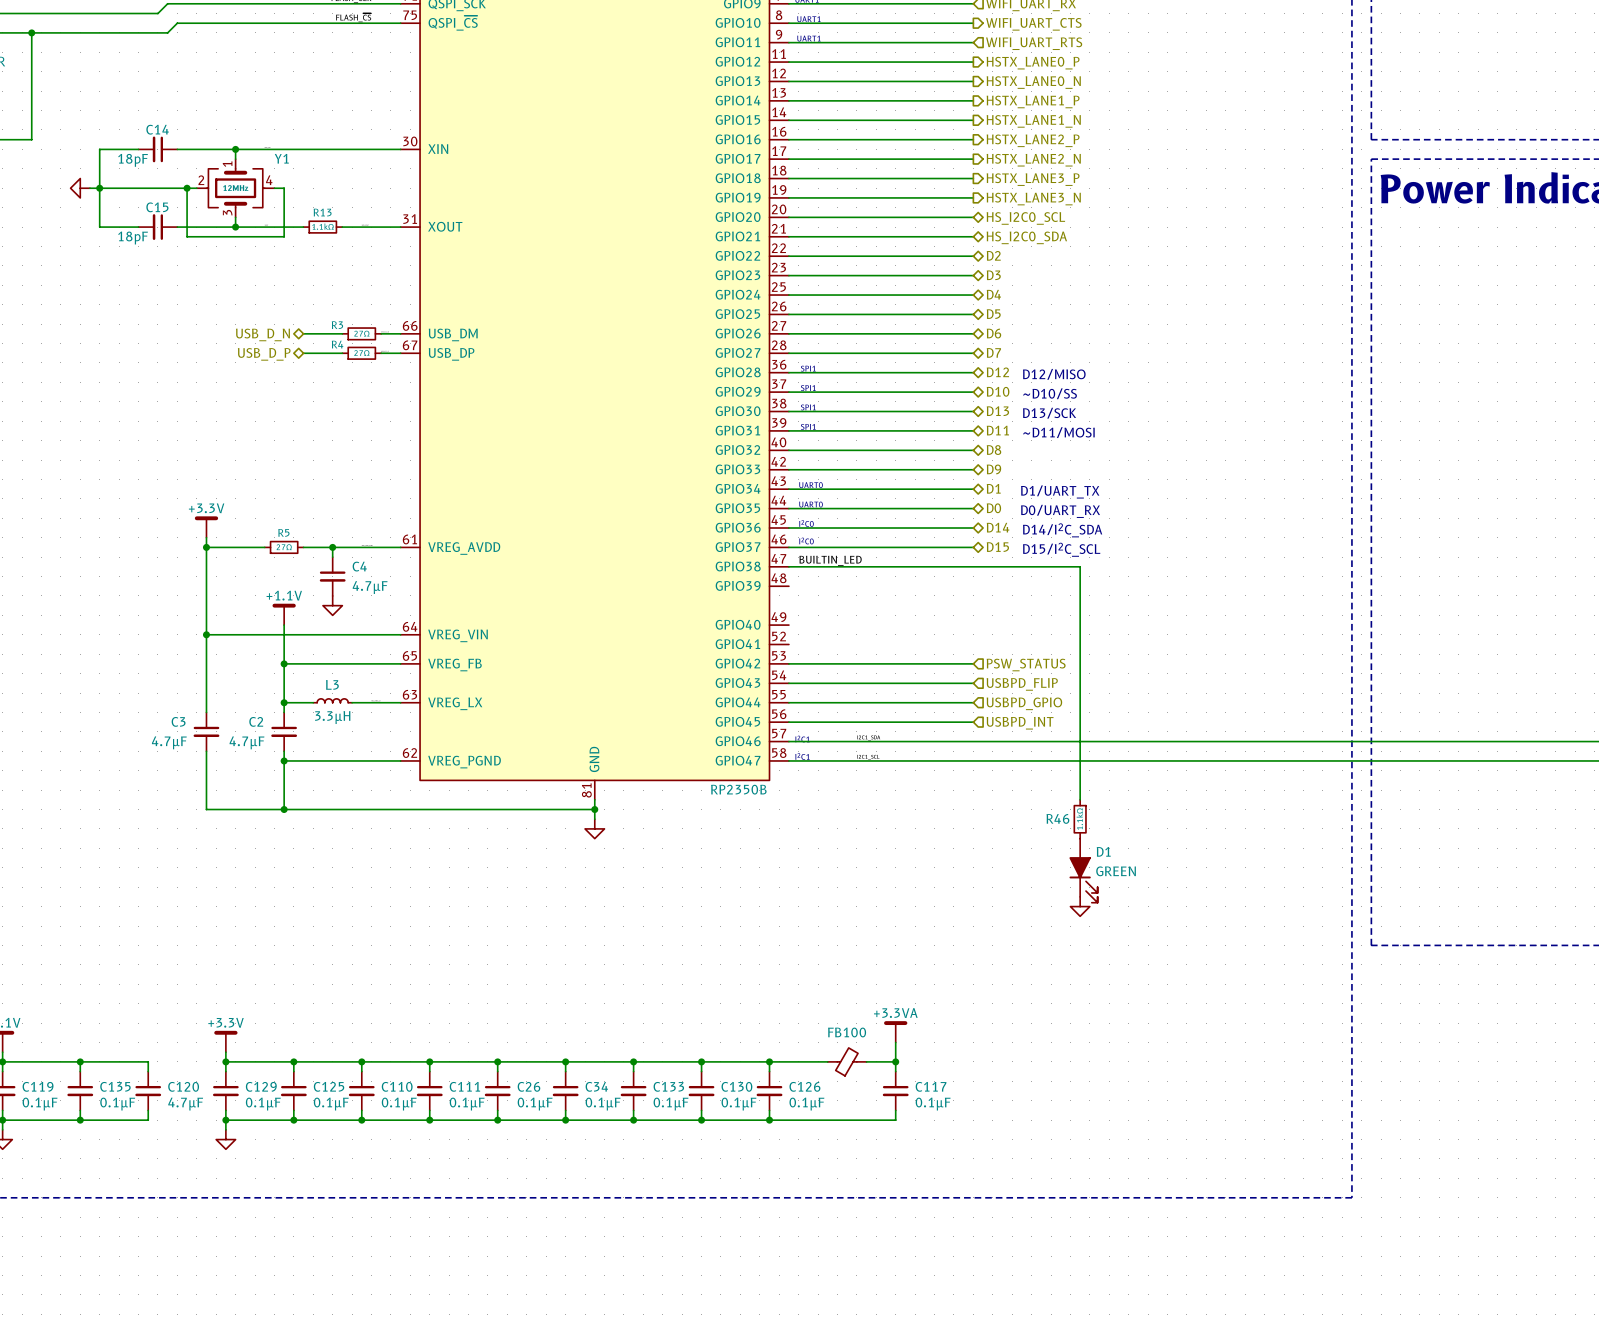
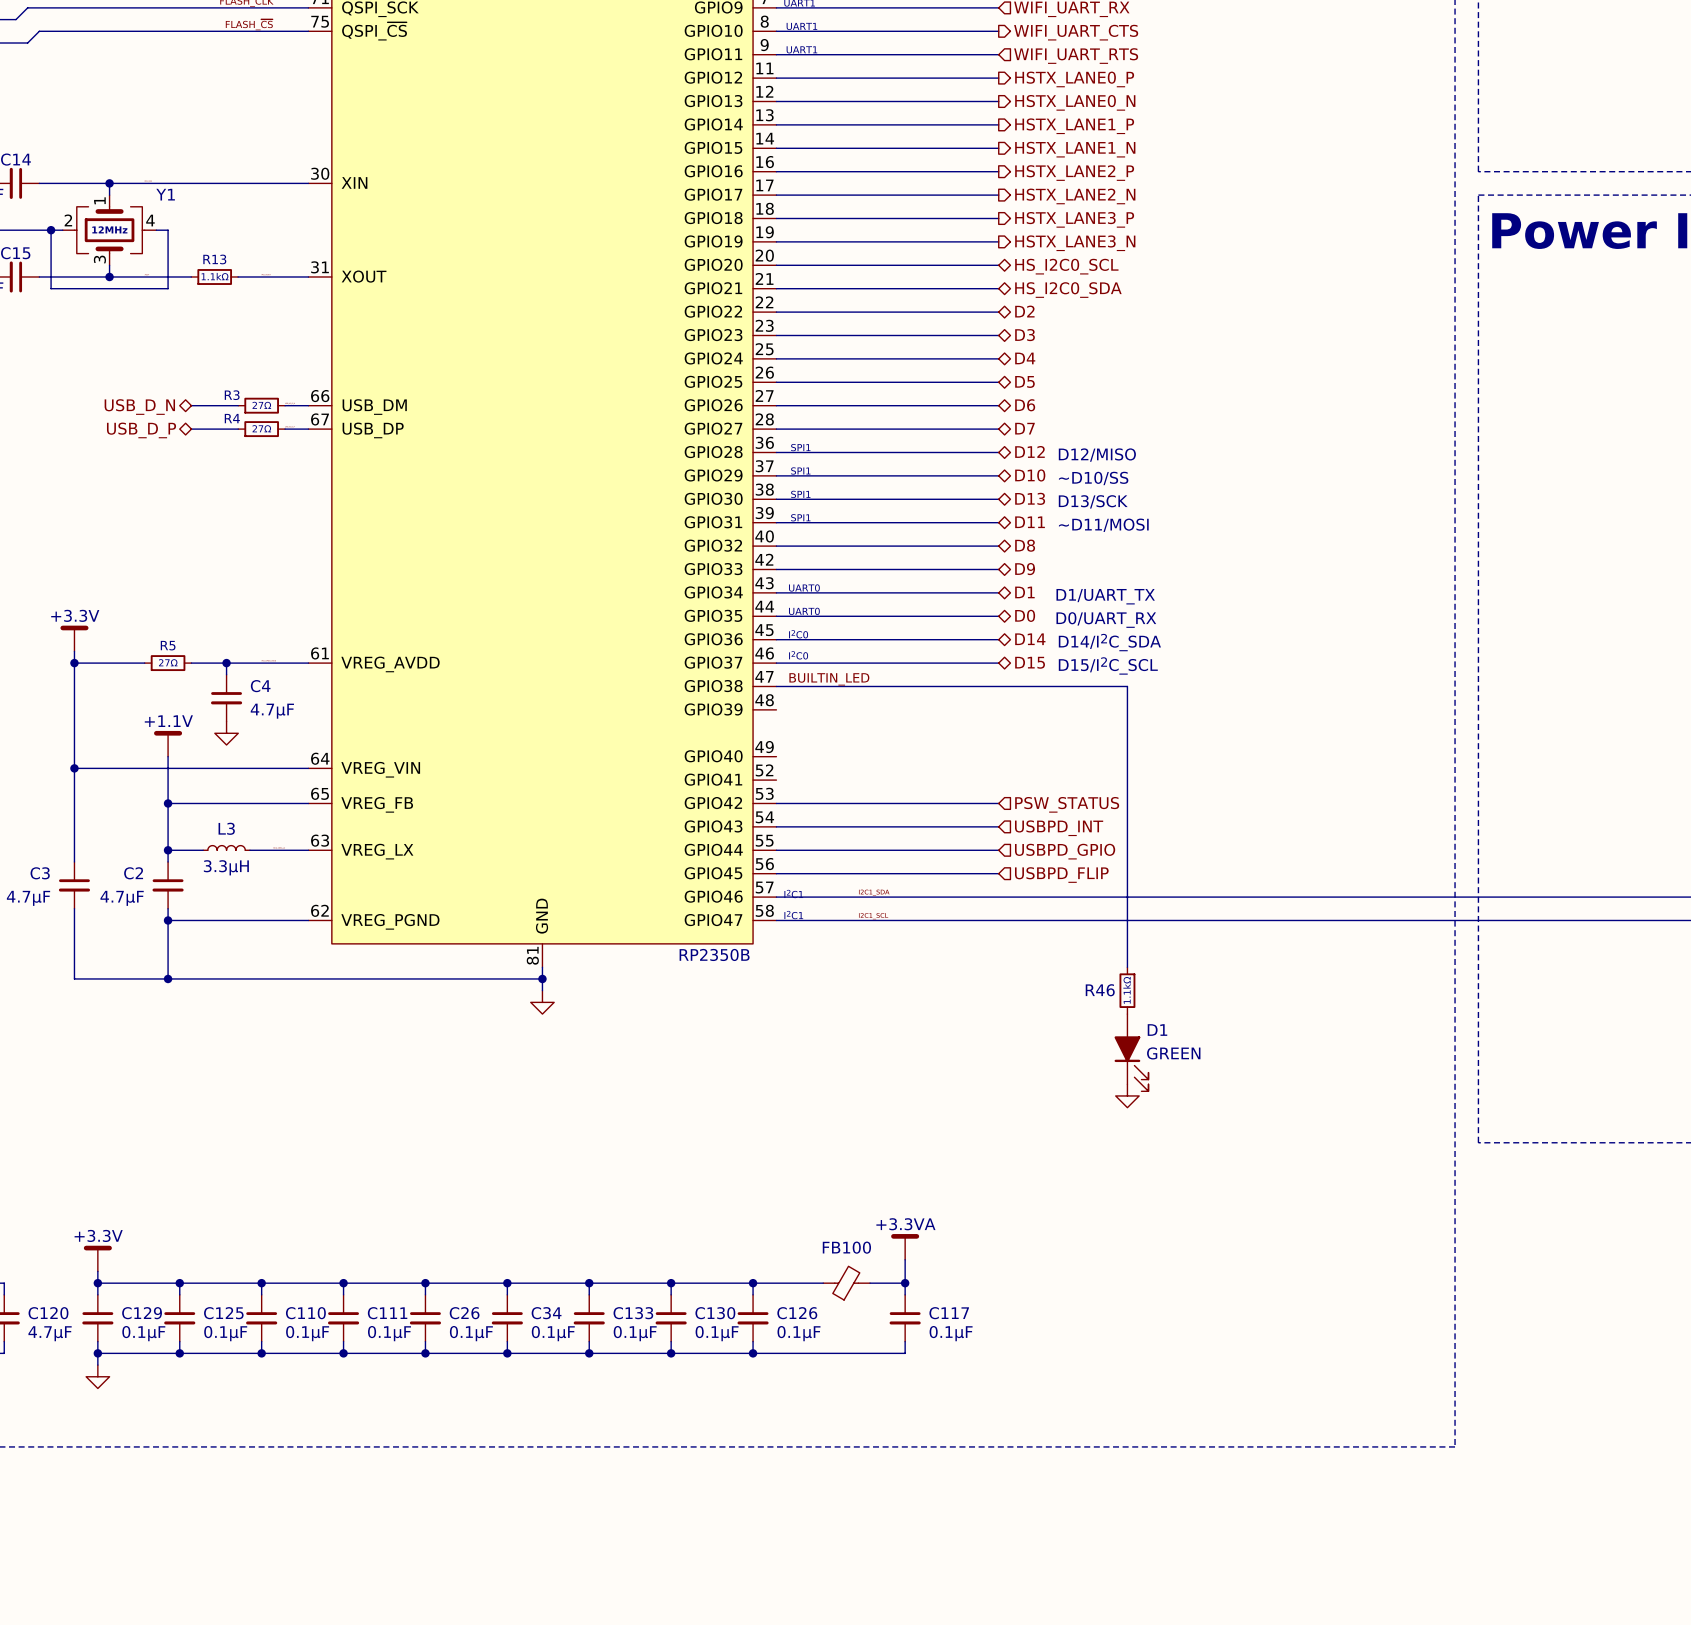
hierarchical label: USBPD_FLIP (1022, 684) -> USBPD_INT (1059, 828)
hierarchical label: USBPD_INT (1020, 723) -> USBPD_FLIP (1061, 875)

